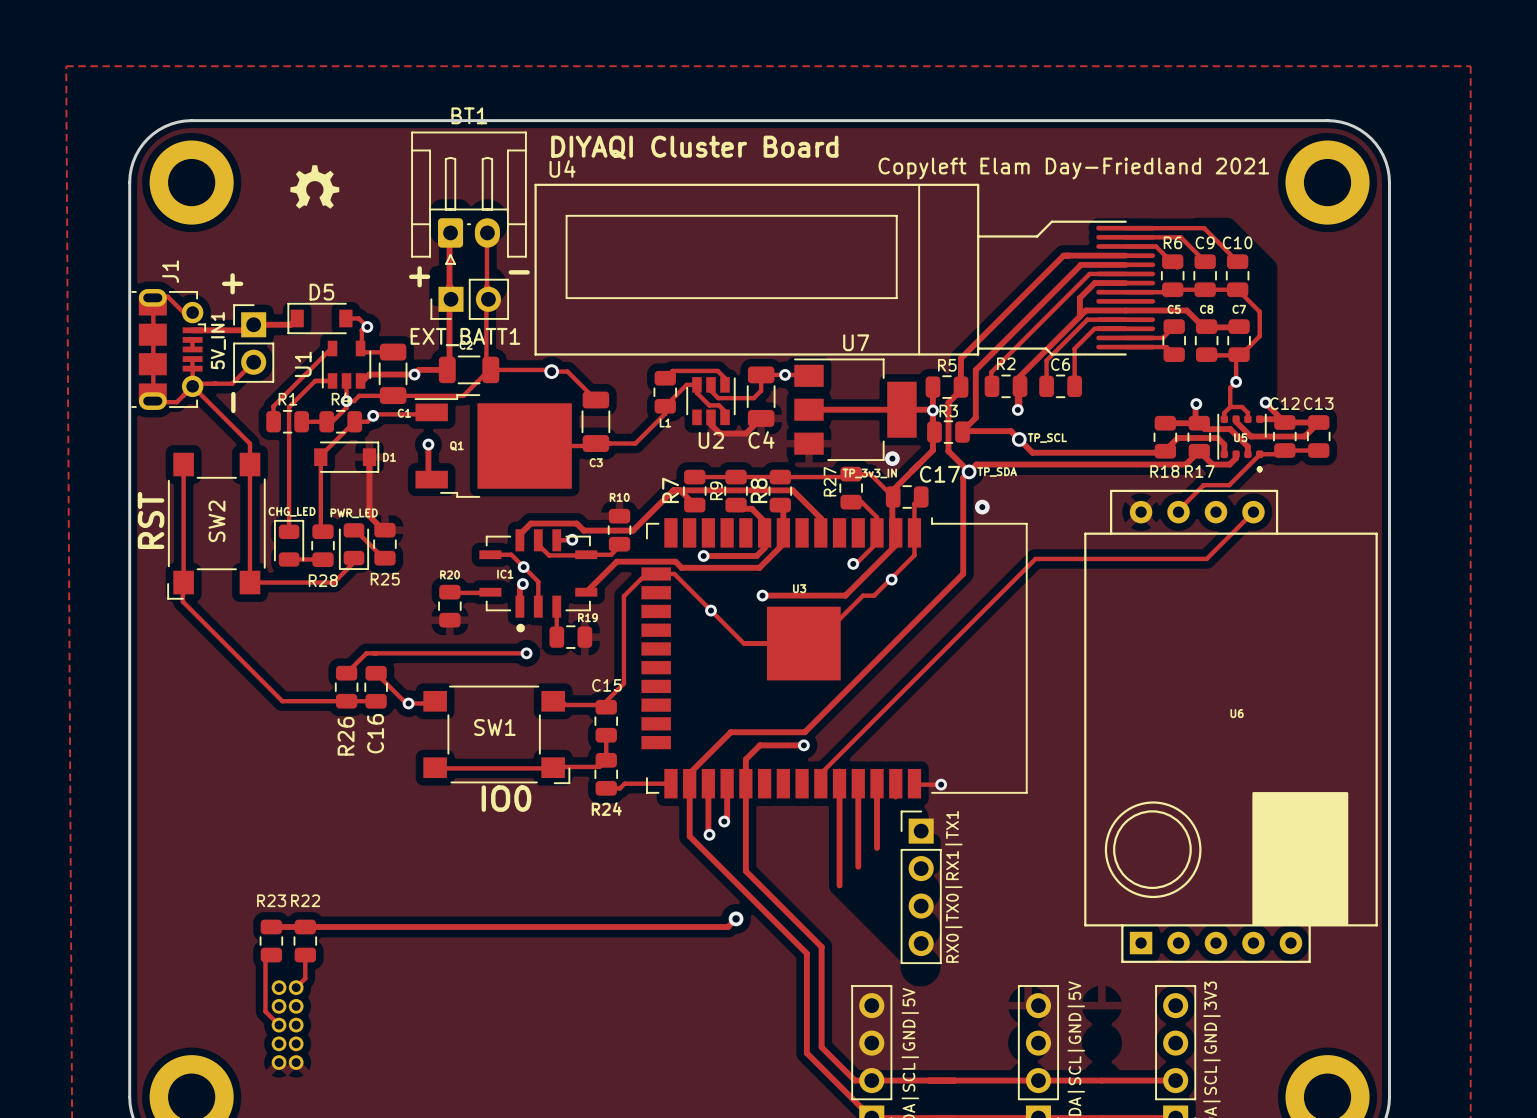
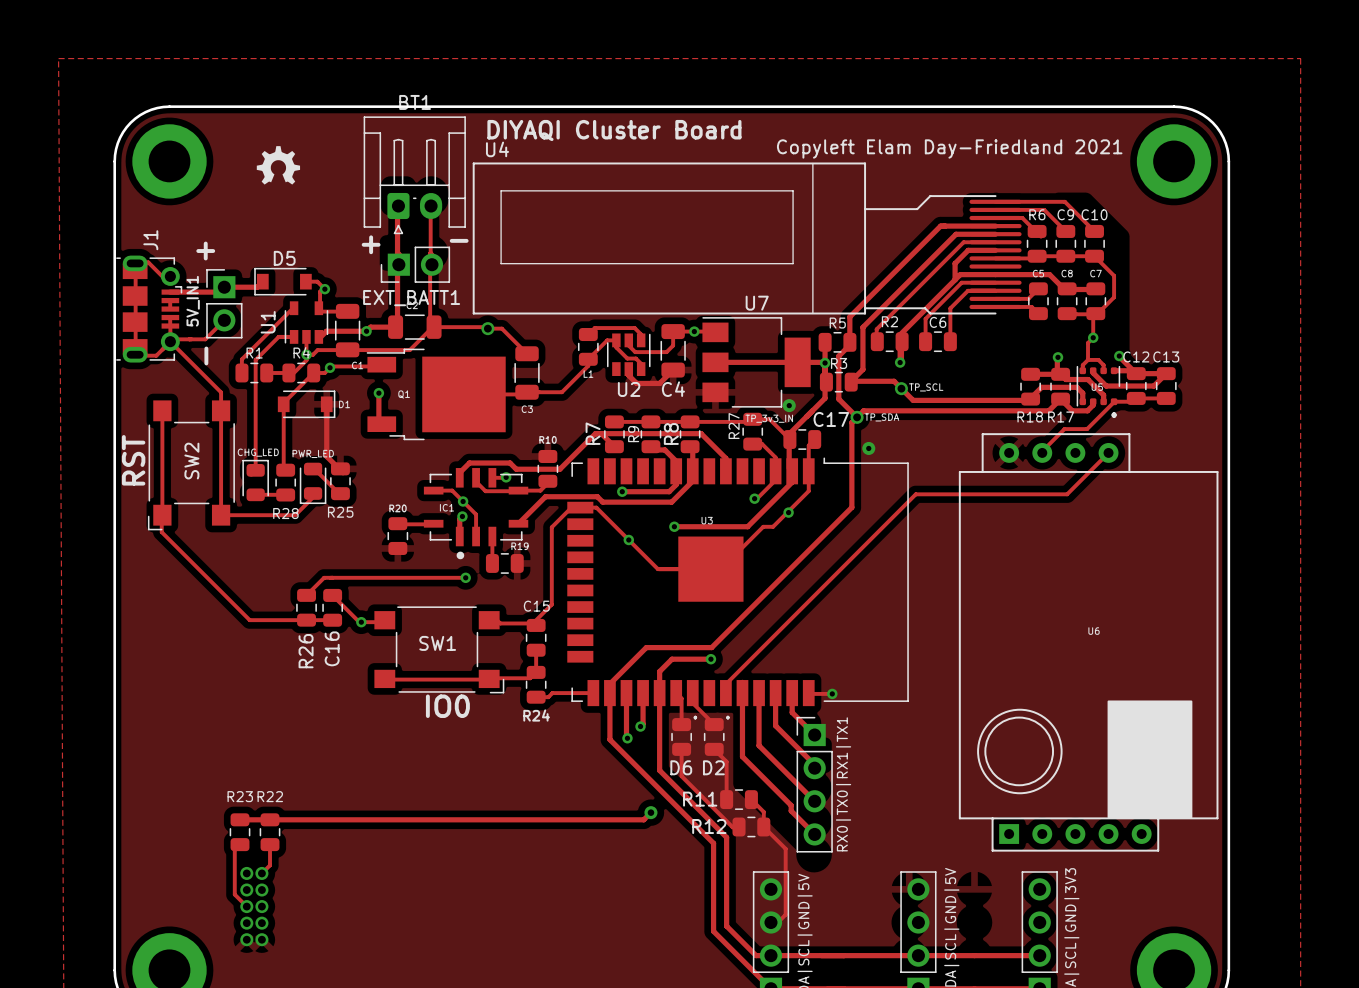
track: none -> (676, 693) (681, 698) (681, 724)
track: none -> (692, 693) (692, 703) (714, 724)
track: none -> (792, 704) (792, 712) (814, 735)
text: none -> . (695, 717)
text: none -> . (727, 717)
track: (877, 820) (877, 848) -> (775, 725) (814, 764) (814, 768)
D6: none -> (681, 736)
D2: none -> (714, 736)
track: (858, 843) (858, 866) -> (759, 745) (814, 801)
track: none -> (681, 749) (681, 776) (732, 826) (739, 826)
track: none -> (714, 749) (726, 761) (726, 799)
track: (839, 855) (839, 885) -> (742, 756) (791, 805) (791, 810) (814, 834)
R11: none -> (739, 799)
track: none -> (751, 799) (763, 811) (763, 826) (785, 848) (785, 914) (777, 922) (770, 922)
R12: none -> (751, 826)

